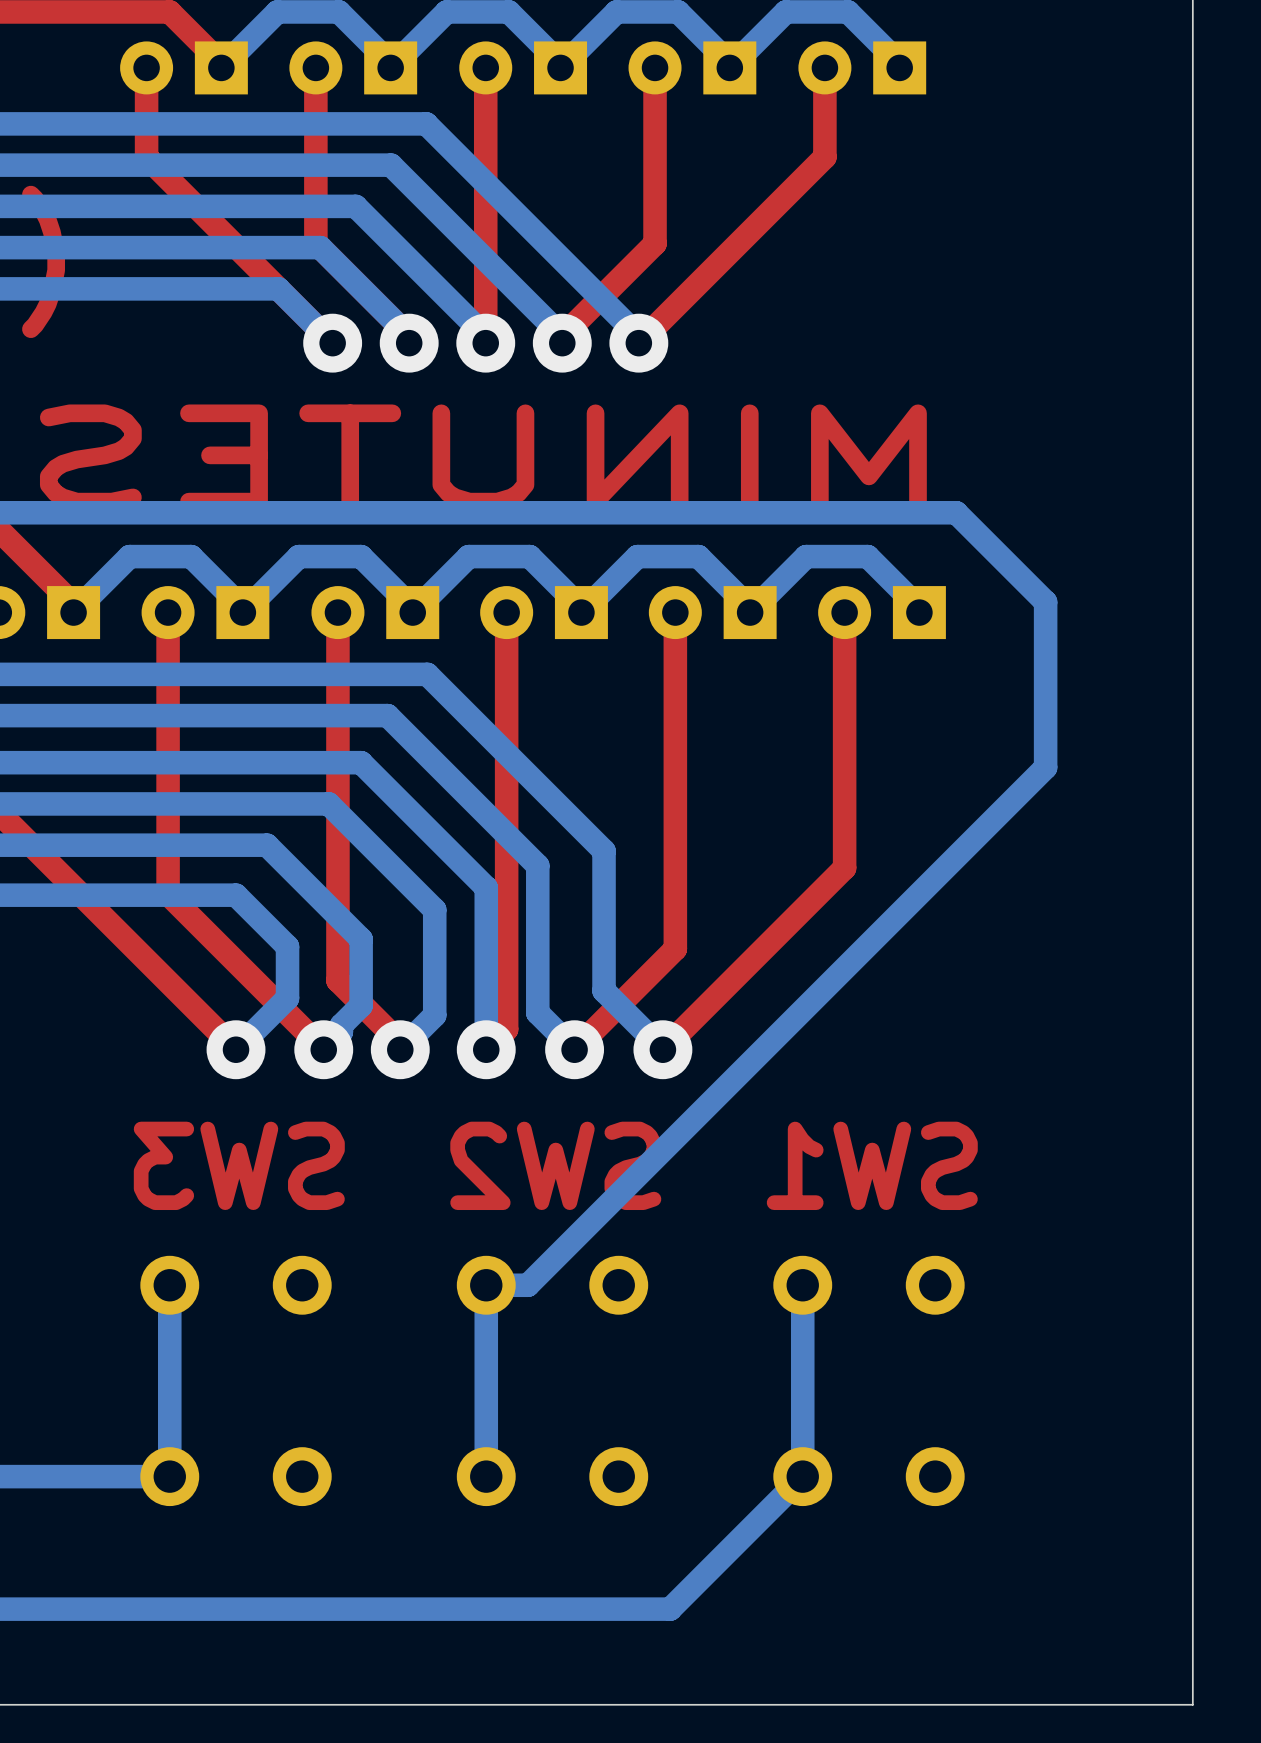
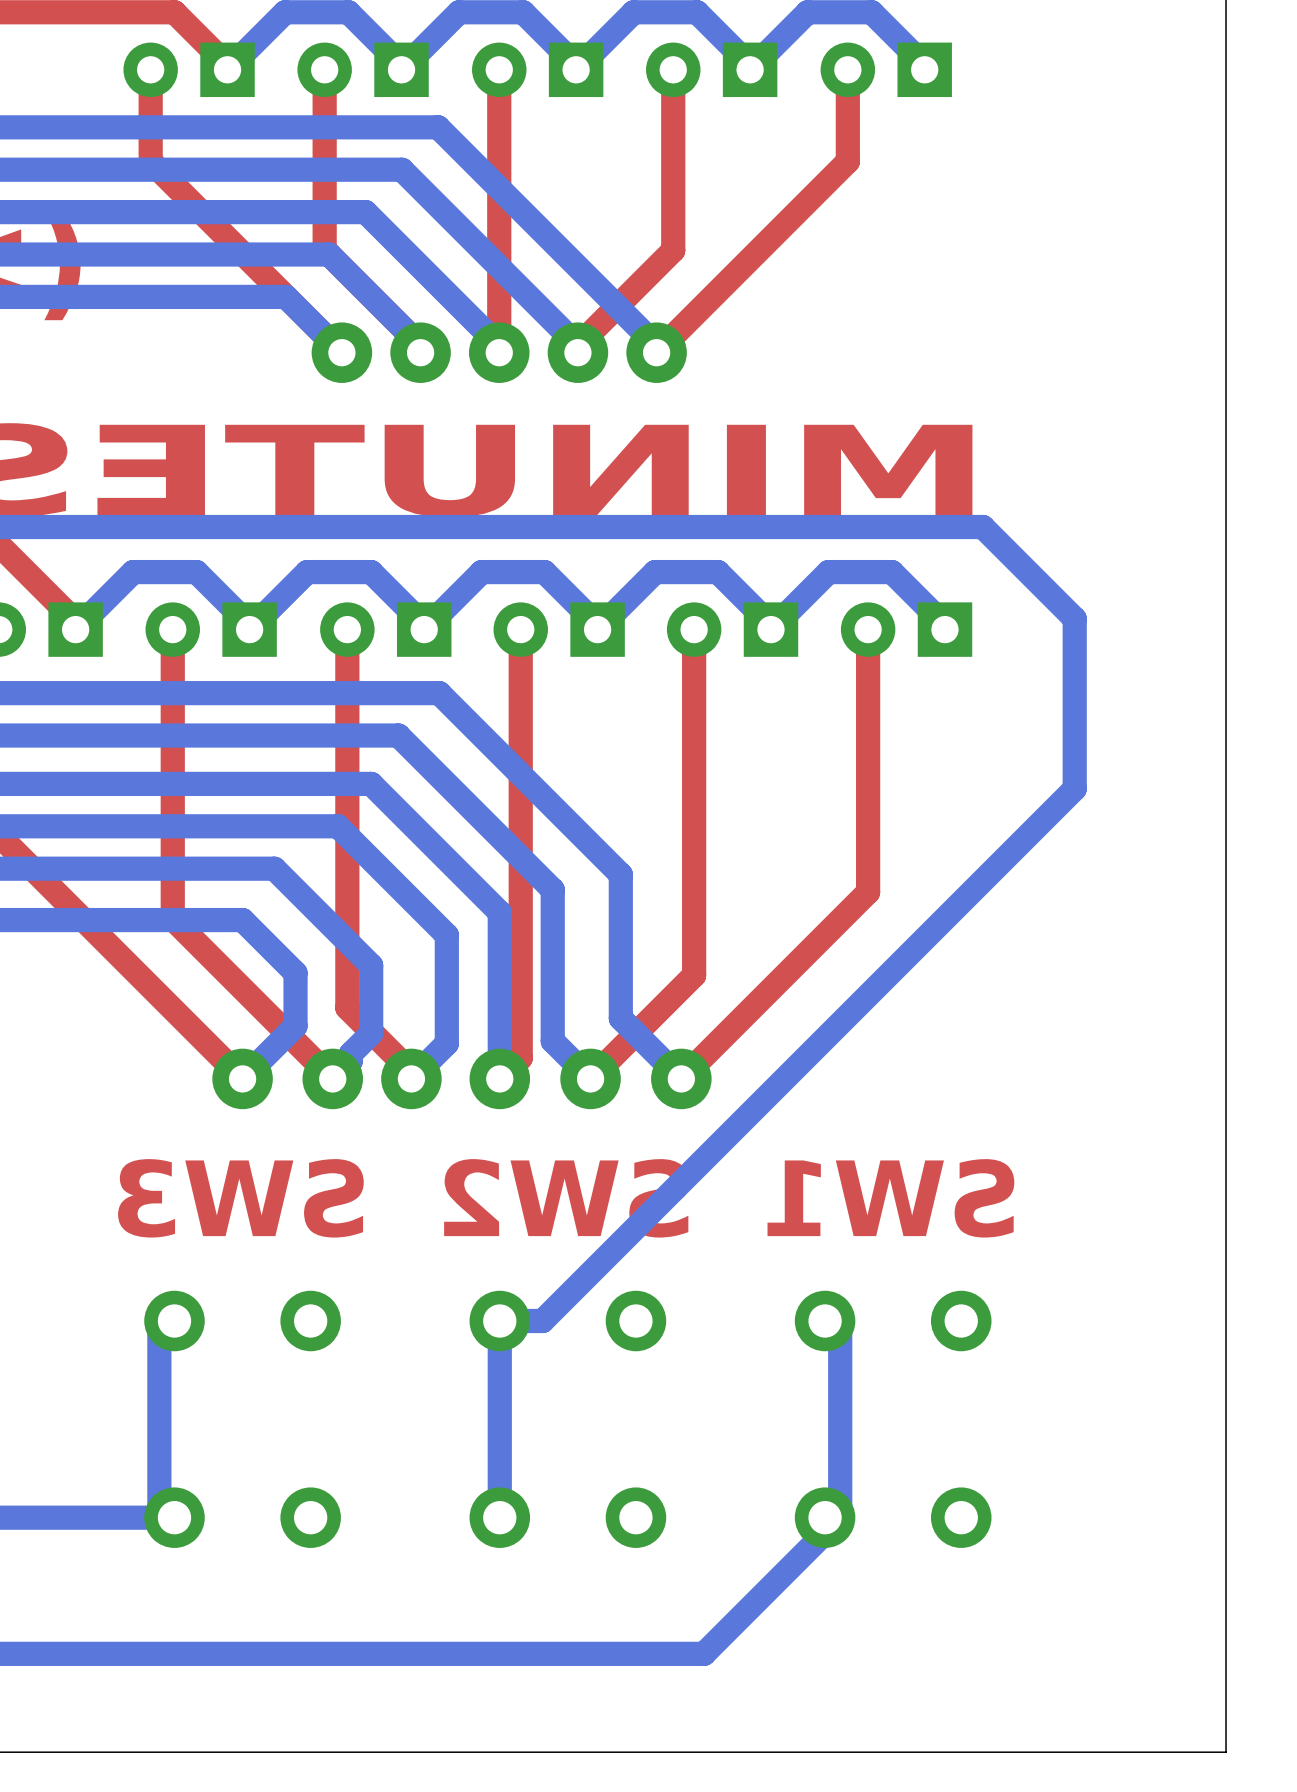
bottom track: (169, 1285) (169, 1476) (155, 1476) -> (159, 1321) (159, 1517)
bottom track: (802, 1285) (802, 1476) (670, 1609) -> (840, 1321) (840, 1517) (704, 1653) (688, 1653)

